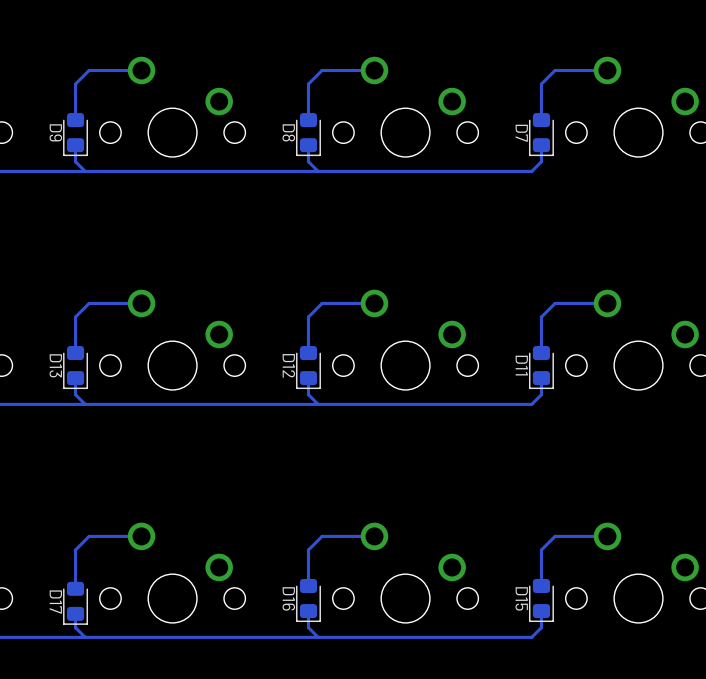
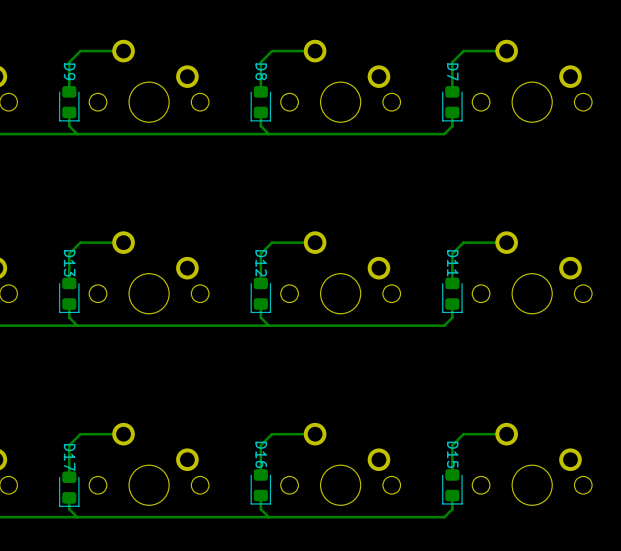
D9 name position: D9 (55, 132) -> D9 (69, 71)
D8 name position: D8 (288, 132) -> D8 (261, 71)
D7 name position: D7 (521, 133) -> D7 (452, 72)
D13 name position: D13 (55, 365) -> D13 (69, 263)
D12 name position: D12 (288, 365) -> D12 (261, 263)
D11 name position: D11 (521, 365) -> D11 (452, 263)
D16 name position: D16 (288, 598) -> D16 (261, 454)
D15 name position: D15 (521, 598) -> D15 (452, 454)
D17 name position: D17 (55, 601) -> D17 (69, 457)

